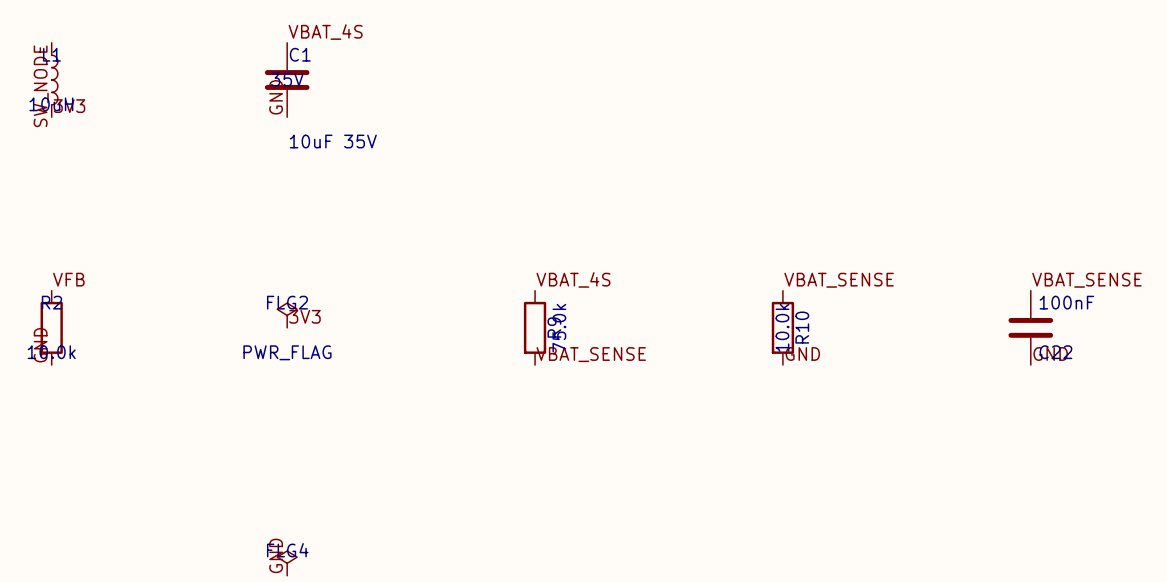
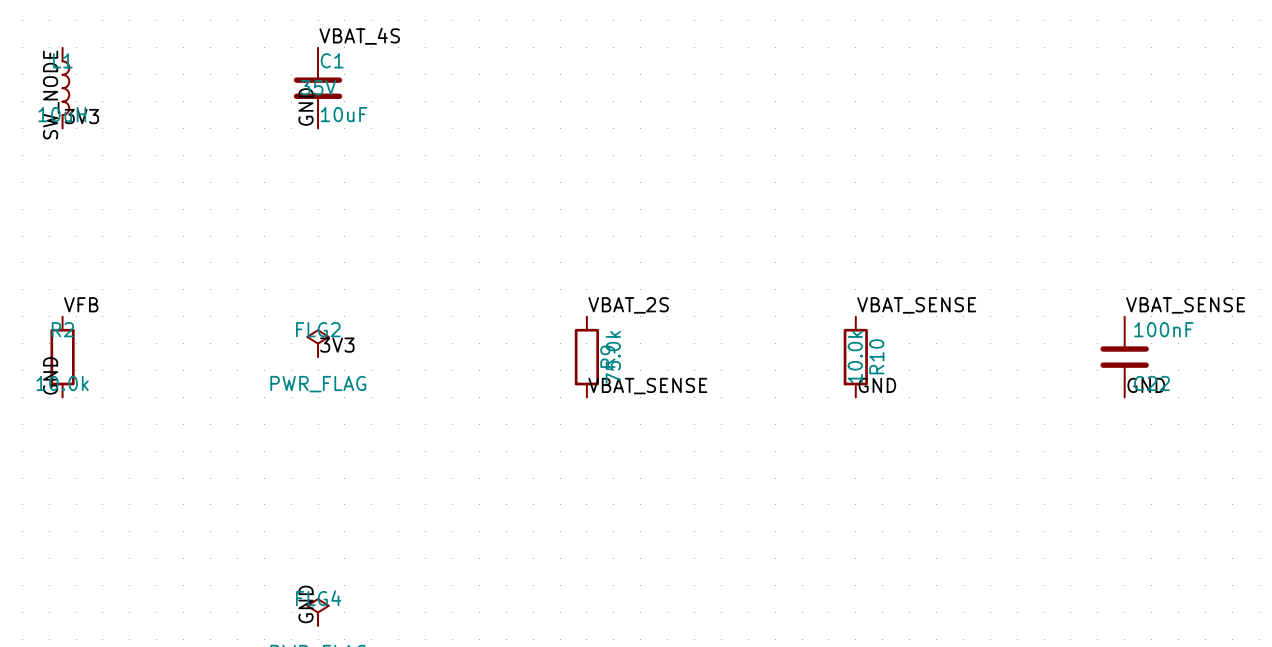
C1 value: 10uF 35V (333, 141) -> 10uF (344, 114)
label: VBAT_4S (573, 279) -> VBAT_2S (628, 305)

